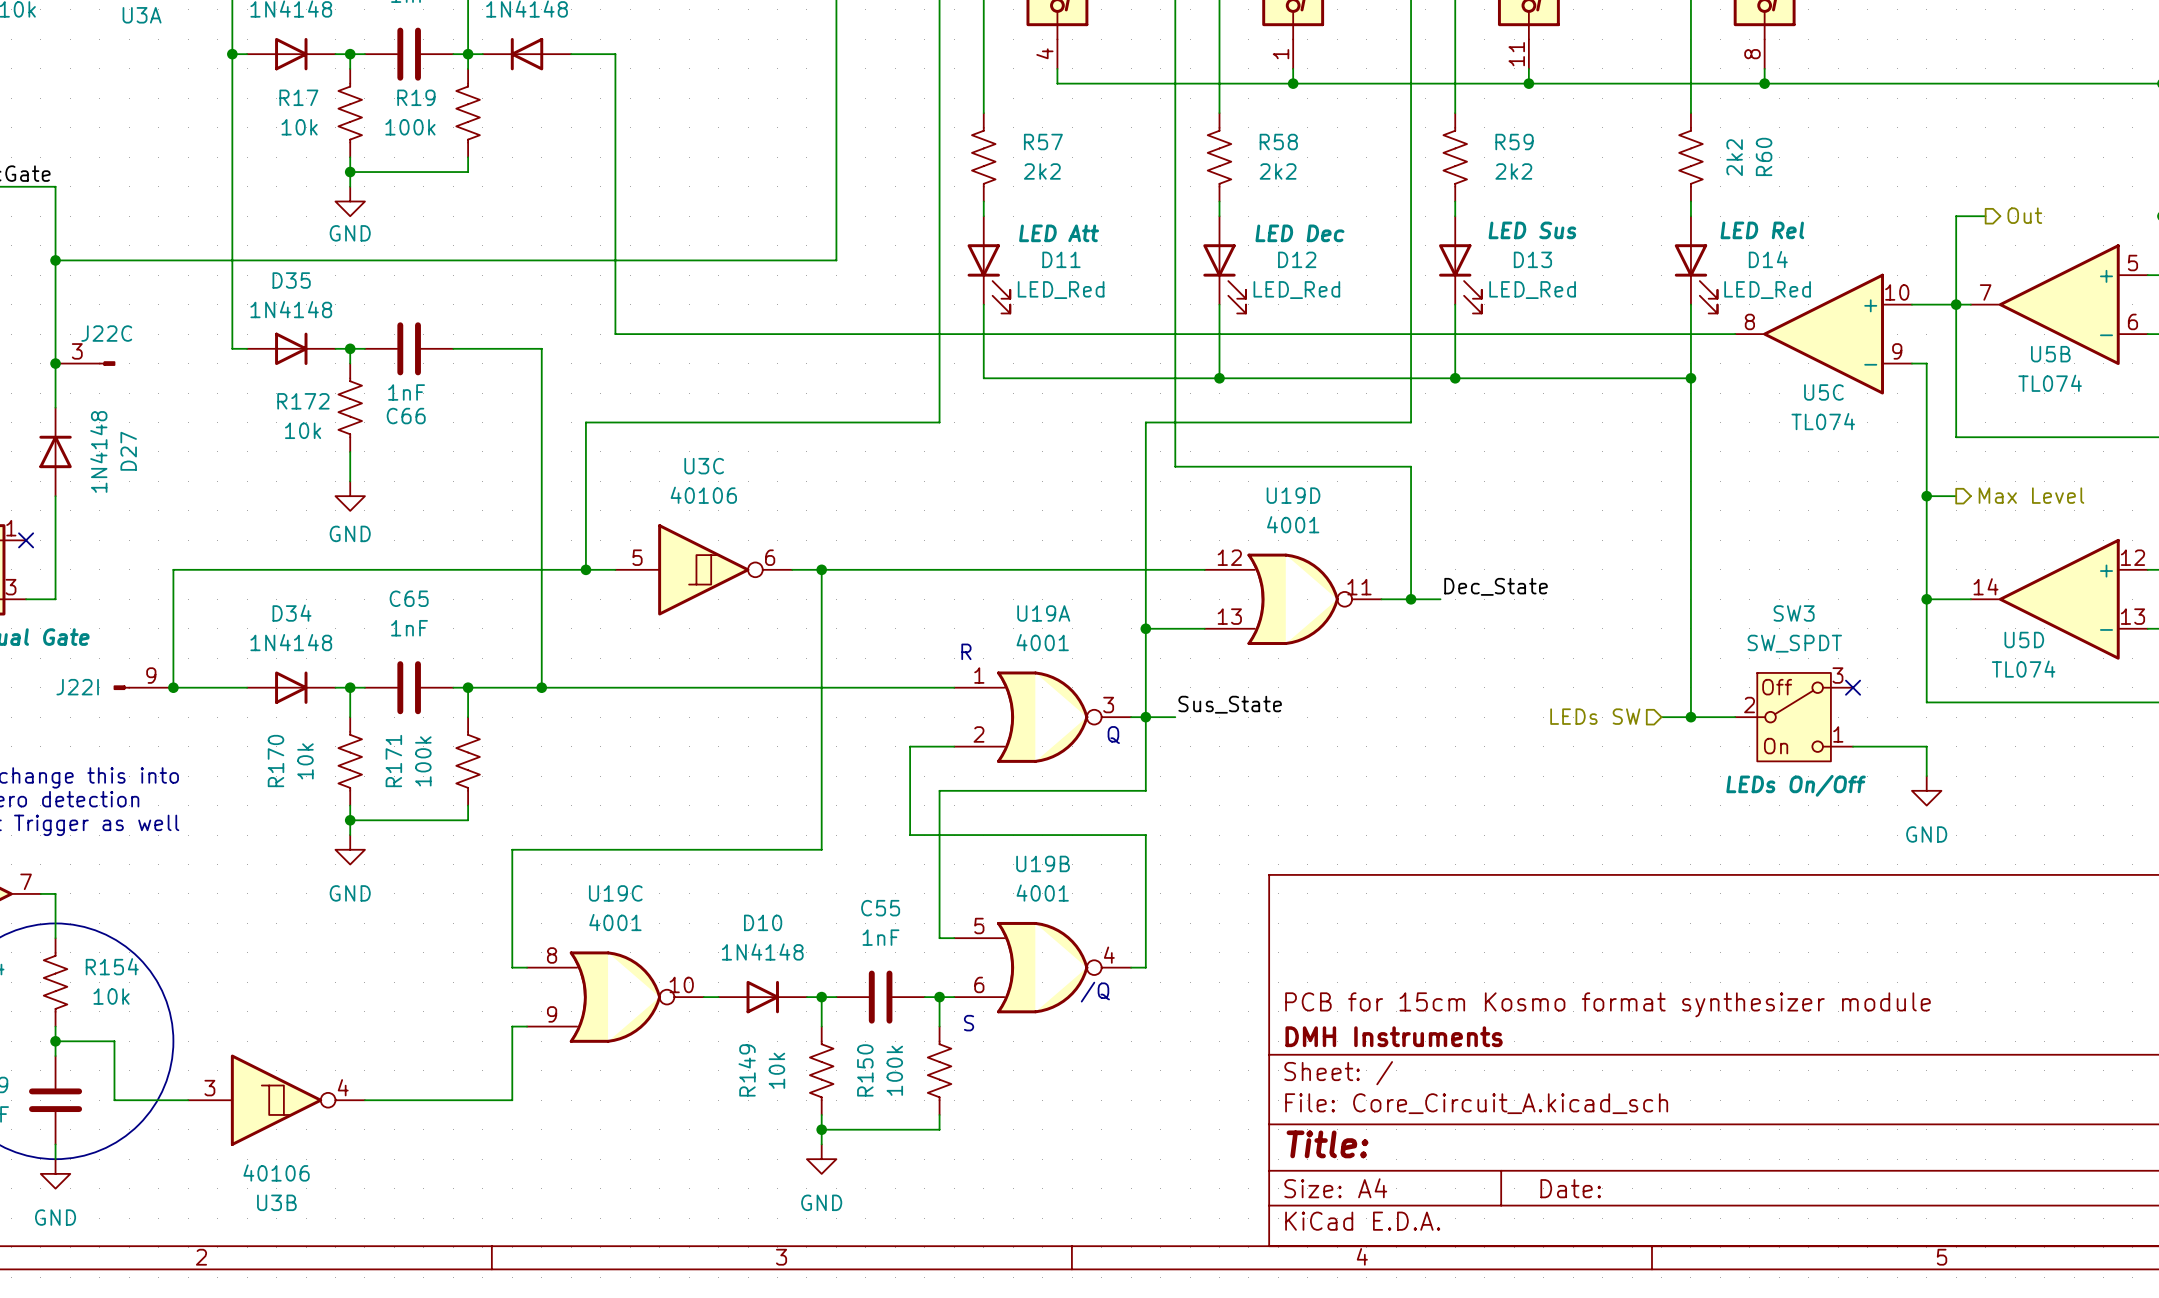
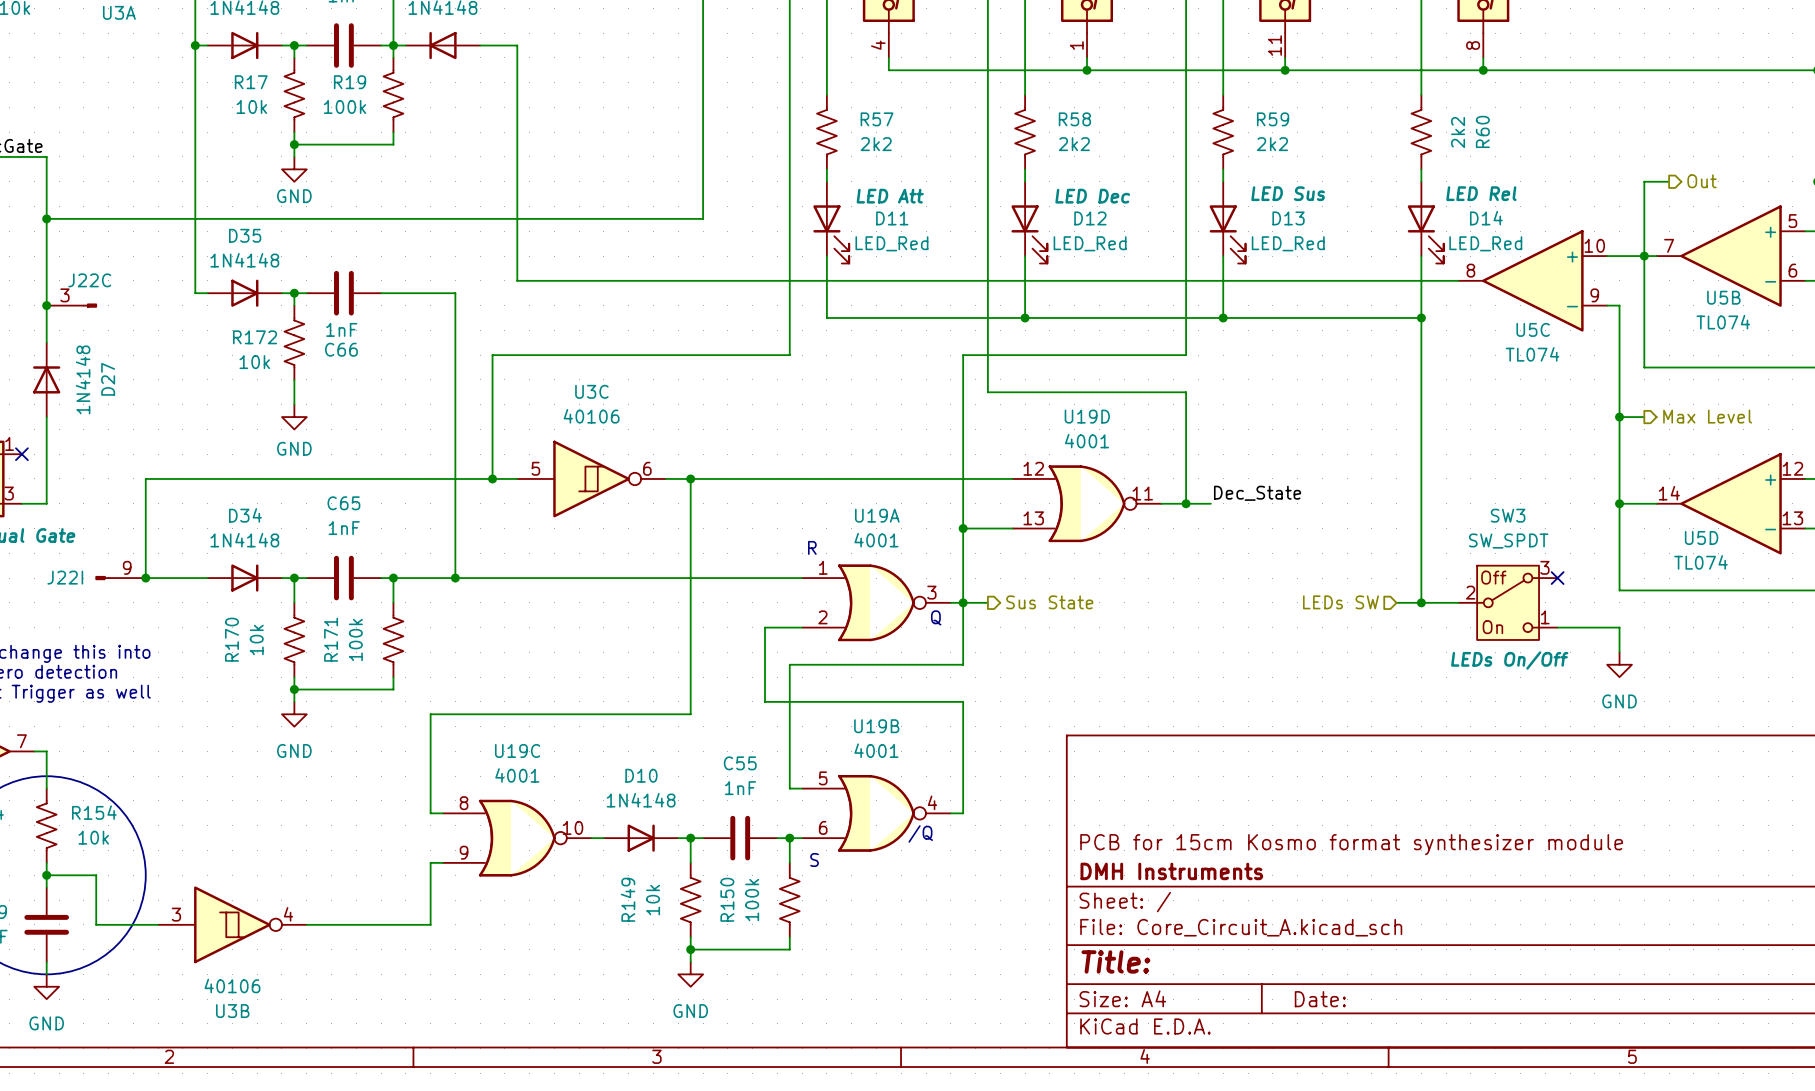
label: Sus_State (1230, 704) -> none
hierarchical label: none -> Sus State (1049, 602)

